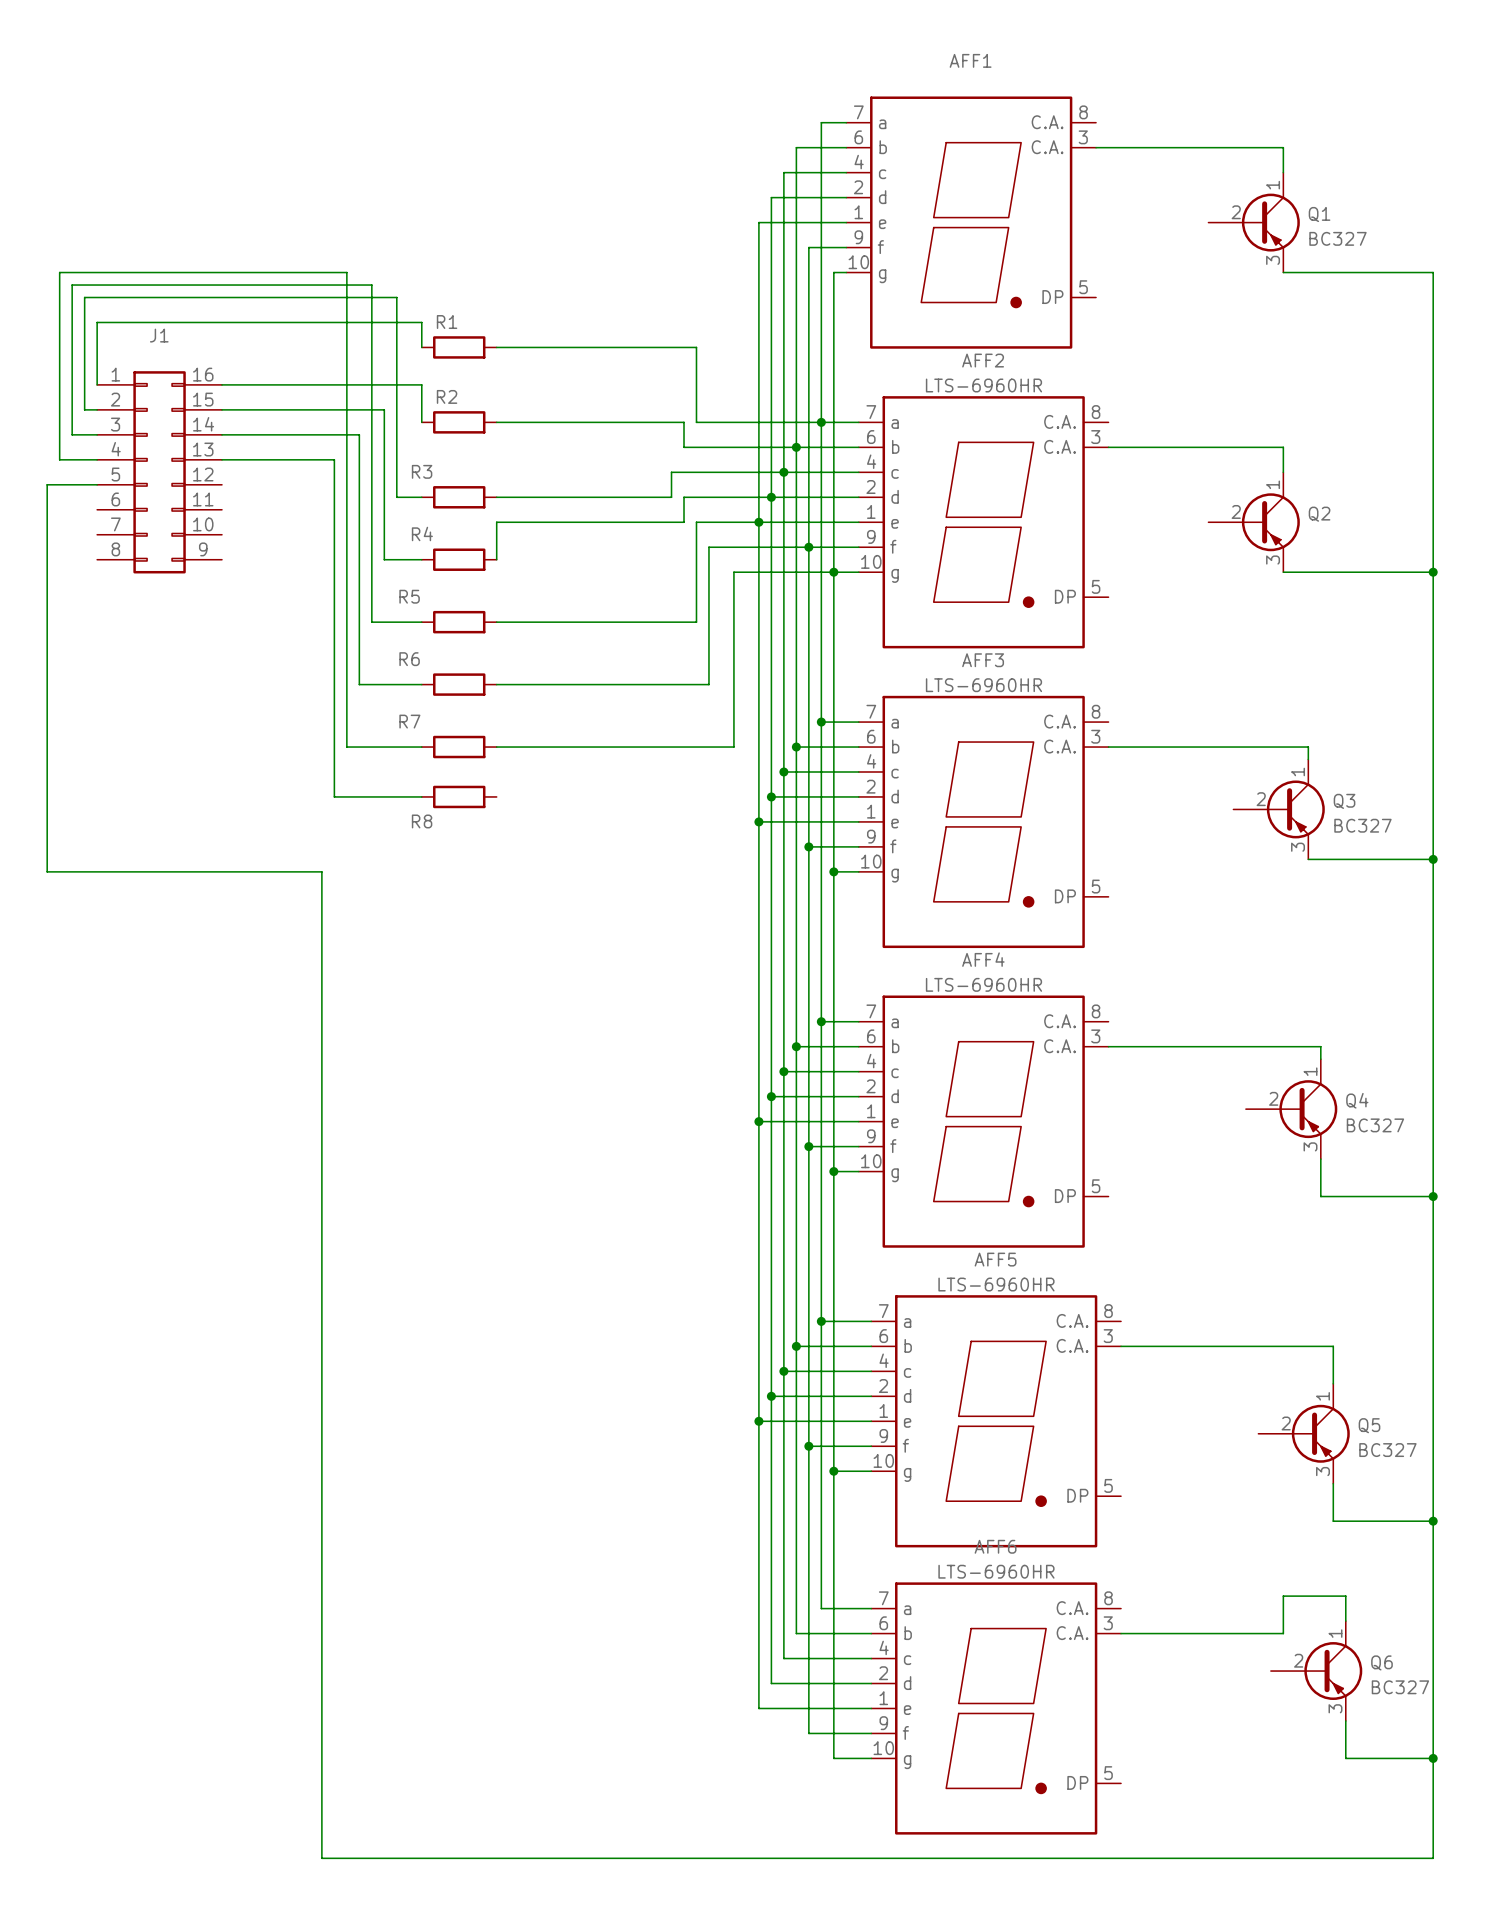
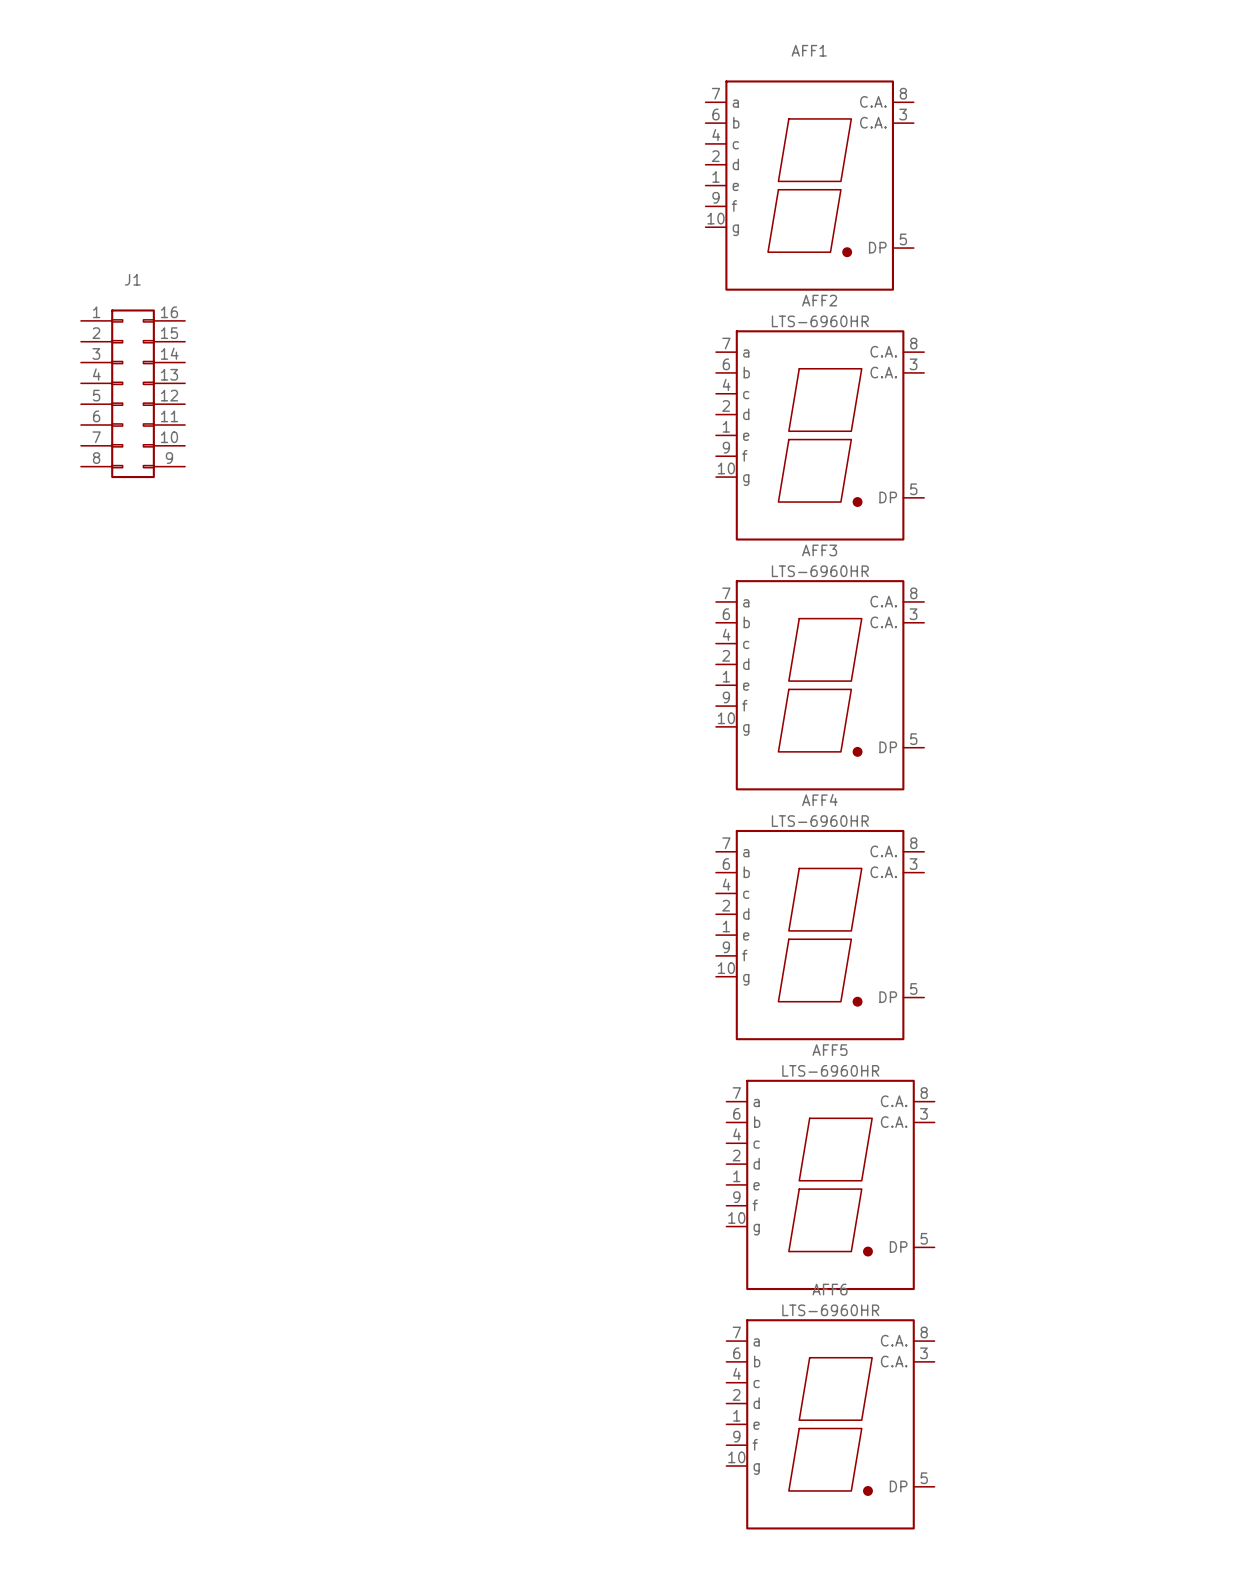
wire: (846, 122) (821, 122) (821, 1608) (871, 1608) -> none
wire: (846, 147) (796, 147) (796, 1633) (871, 1633) -> none
wire: (1096, 147) (1283, 147) (1283, 172) -> none
wire: (846, 172) (783, 172) (783, 1658) (871, 1658) -> none
wire: (846, 197) (771, 197) (771, 1683) (871, 1683) -> none
wire: (846, 222) (758, 222) (758, 1708) (871, 1708) -> none
Q1: BC327 (1254, 222) -> none
wire: (846, 247) (808, 247) (808, 1733) (871, 1733) -> none
wire: (846, 272) (833, 272) (833, 1758) (871, 1758) -> none
wire: (1283, 272) (1433, 272) (1433, 1858) (321, 1858) (321, 871) (47, 871) (47, 484) (97, 484) -> none
wire: (421, 347) (421, 322) (97, 322) (97, 384) -> none
R1: (459, 347) -> none
wire: (496, 347) (696, 347) (696, 422) (858, 422) -> none
wire: (222, 384) (421, 384) (421, 422) -> none
wire: (97, 409) (84, 409) (84, 297) (396, 297) (396, 497) (421, 497) -> none
wire: (222, 409) (384, 409) (384, 559) (421, 559) -> none
R2: (459, 422) -> none
wire: (496, 422) (684, 422) (684, 447) (858, 447) -> none
junction: (821, 422) -> none
wire: (97, 434) (72, 434) (72, 285) (371, 285) (371, 622) (421, 622) -> none
wire: (222, 434) (359, 434) (359, 684) (421, 684) -> none
junction: (796, 447) -> none
wire: (1108, 447) (1283, 447) (1283, 472) -> none
wire: (97, 459) (59, 459) (59, 272) (346, 272) (346, 747) (421, 747) -> none
wire: (222, 459) (334, 459) (334, 796) (421, 796) -> none
junction: (783, 472) -> none
wire: (858, 472) (671, 472) (671, 497) (496, 497) -> none
R3: (459, 497) -> none
junction: (771, 497) -> none
wire: (858, 497) (684, 497) (684, 522) (496, 522) (496, 559) -> none
junction: (758, 522) -> none
wire: (858, 522) (696, 522) (696, 622) (496, 622) -> none
Q2: (1254, 522) -> none
junction: (808, 547) -> none
wire: (858, 547) (708, 547) (708, 684) (496, 684) -> none
R4: (459, 559) -> none
junction: (833, 572) -> none
wire: (858, 572) (733, 572) (733, 747) (496, 747) -> none
wire: (1283, 572) (1433, 572) -> none
junction: (1433, 572) -> none
R5: (459, 622) -> none
R6: (459, 684) -> none
wire: (821, 722) (858, 722) -> none
junction: (821, 722) -> none
R7: (459, 747) -> none
wire: (796, 747) (858, 747) -> none
junction: (796, 747) -> none
wire: (1108, 747) (1308, 747) (1308, 759) -> none
wire: (783, 771) (858, 771) -> none
junction: (783, 771) -> none
R8: (459, 796) -> none
wire: (771, 796) (858, 796) -> none
junction: (771, 796) -> none
Q3: BC327 (1279, 809) -> none
wire: (758, 821) (858, 821) -> none
junction: (758, 821) -> none
wire: (808, 846) (858, 846) -> none
junction: (808, 846) -> none
wire: (1308, 859) (1433, 859) -> none
junction: (1433, 859) -> none
wire: (833, 871) (858, 871) -> none
junction: (833, 871) -> none
wire: (821, 1021) (858, 1021) -> none
junction: (821, 1021) -> none
wire: (796, 1046) (858, 1046) -> none
junction: (796, 1046) -> none
wire: (1108, 1046) (1320, 1046) (1320, 1059) -> none
wire: (783, 1071) (858, 1071) -> none
junction: (783, 1071) -> none
wire: (771, 1096) (858, 1096) -> none
junction: (771, 1096) -> none
Q4: BC327 (1291, 1109) -> none
wire: (758, 1121) (858, 1121) -> none
junction: (758, 1121) -> none
wire: (808, 1146) (858, 1146) -> none
junction: (808, 1146) -> none
wire: (1320, 1159) (1320, 1196) (1433, 1196) -> none
wire: (833, 1171) (858, 1171) -> none
junction: (833, 1171) -> none
junction: (1433, 1196) -> none
wire: (821, 1321) (871, 1321) -> none
junction: (821, 1321) -> none
wire: (796, 1346) (871, 1346) -> none
junction: (796, 1346) -> none
wire: (1121, 1346) (1333, 1346) (1333, 1383) -> none
wire: (783, 1371) (871, 1371) -> none
junction: (783, 1371) -> none
wire: (771, 1396) (871, 1396) -> none
junction: (771, 1396) -> none
wire: (758, 1421) (871, 1421) -> none
junction: (758, 1421) -> none
Q5: BC327 (1304, 1433) -> none
wire: (808, 1446) (871, 1446) -> none
junction: (808, 1446) -> none
wire: (833, 1471) (871, 1471) -> none
junction: (833, 1471) -> none
wire: (1333, 1483) (1333, 1521) (1433, 1521) -> none
junction: (1433, 1521) -> none
wire: (1345, 1621) (1345, 1596) (1283, 1596) (1283, 1633) (1121, 1633) -> none
Q6: BC327 (1316, 1671) -> none
wire: (1345, 1720) (1345, 1758) (1433, 1758) -> none
junction: (1433, 1758) -> none

